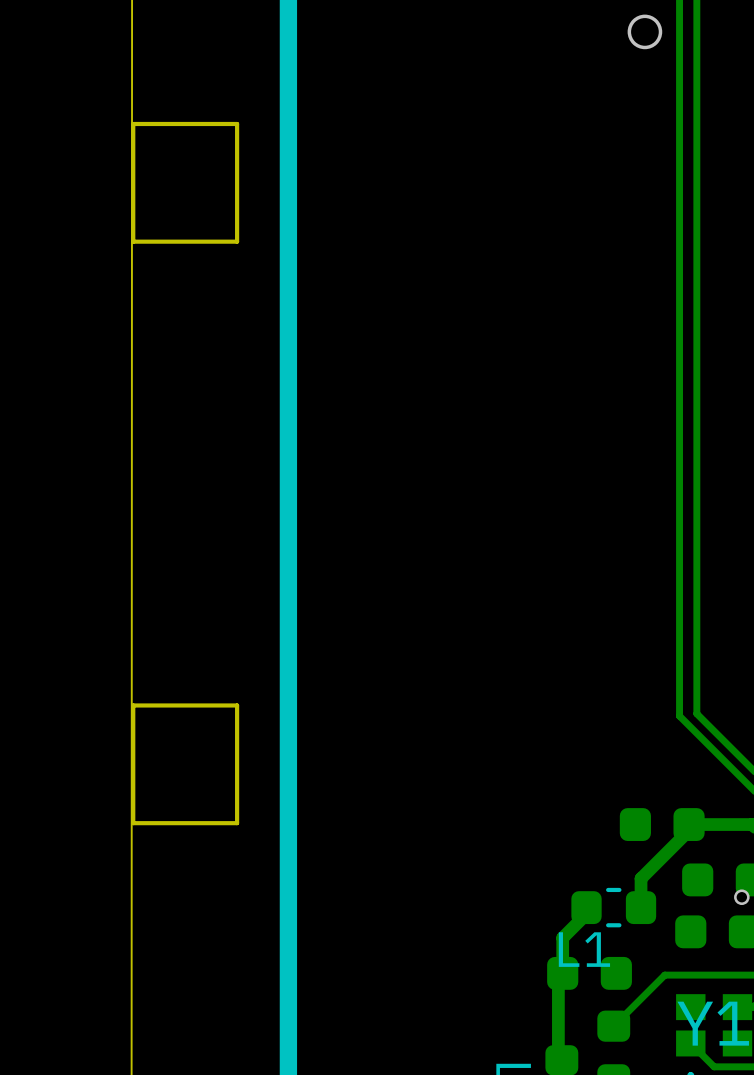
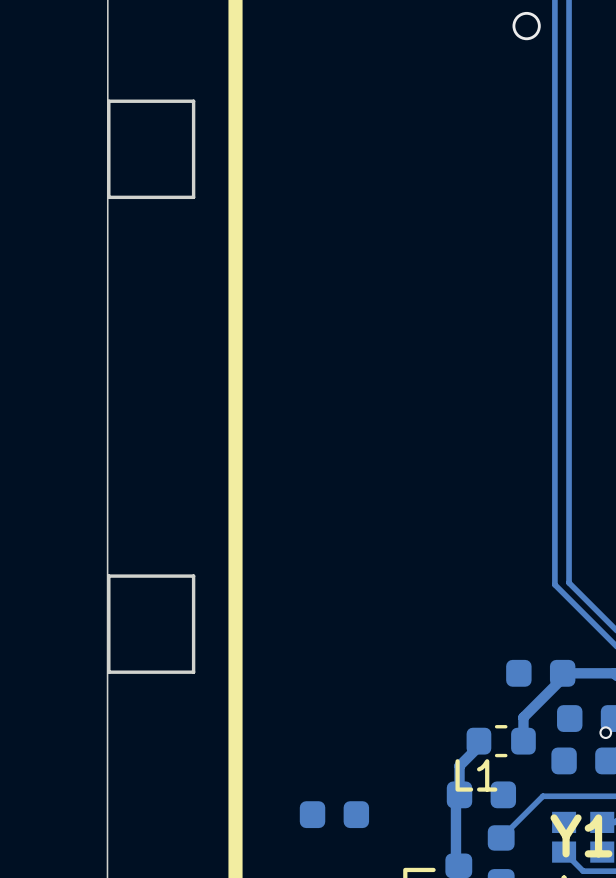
part: none -> (334, 814)

